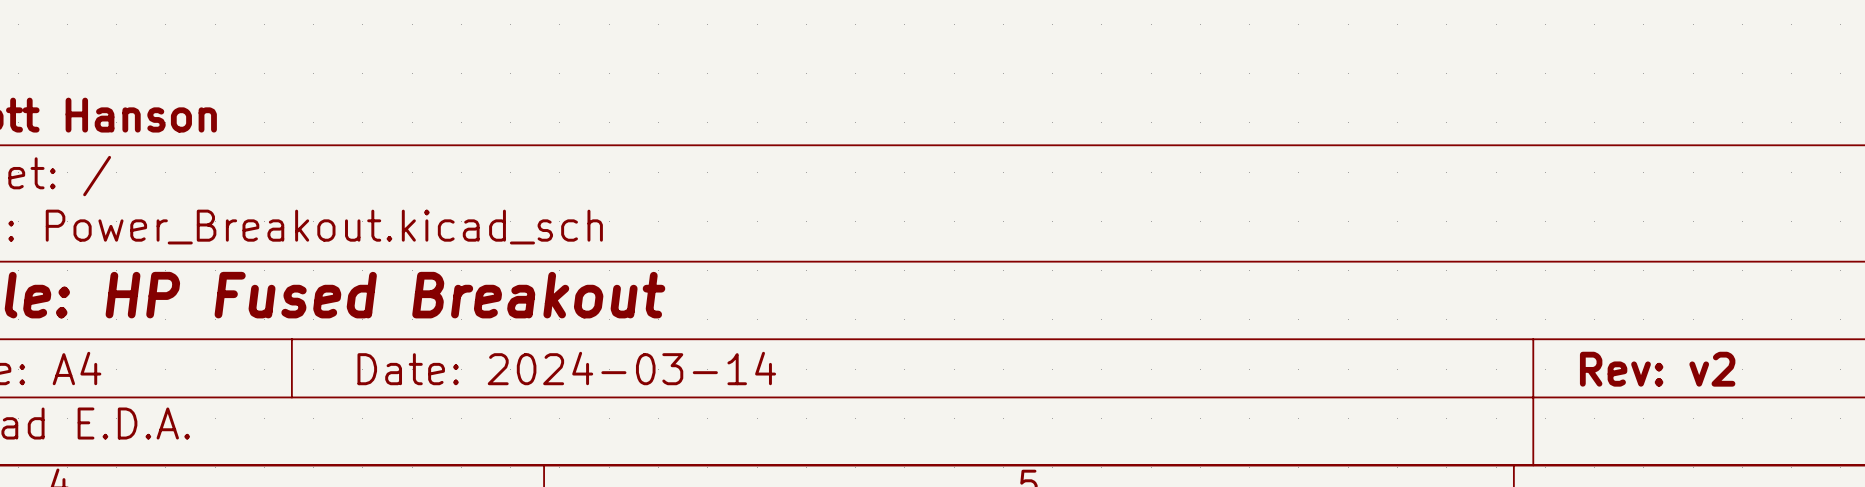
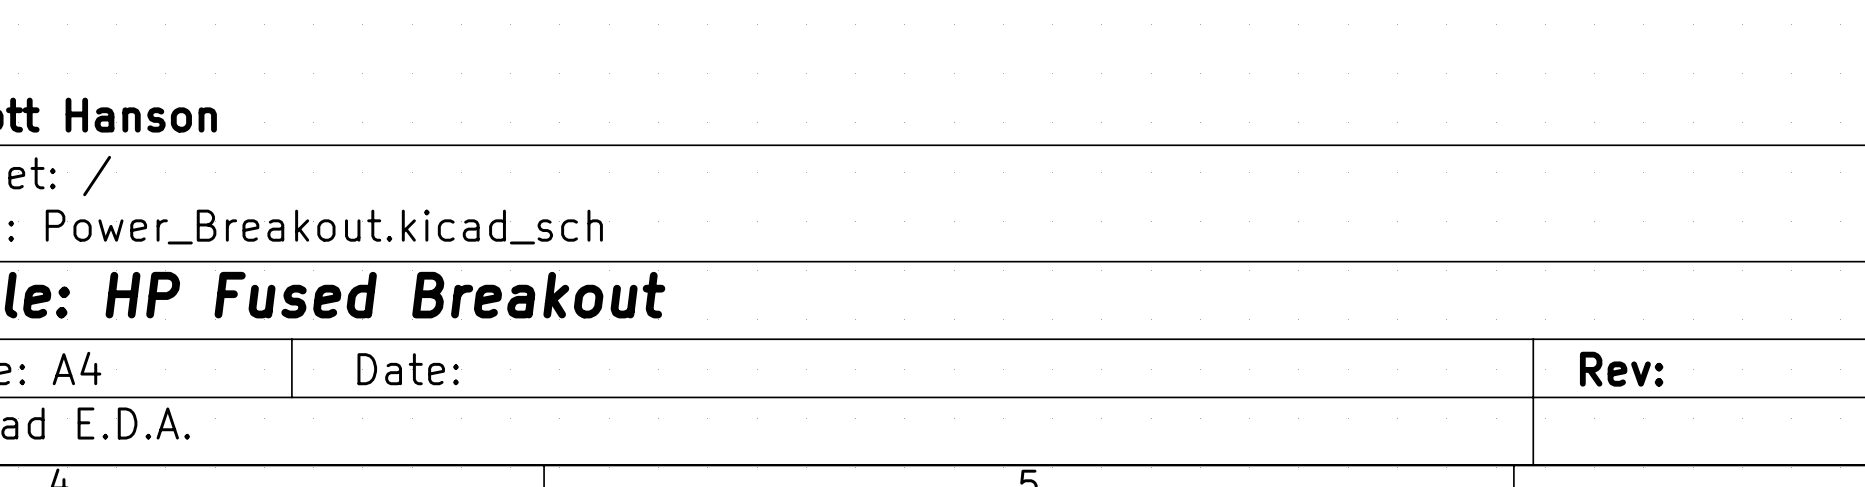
title block: Date: 2024-03-14 (566, 368) -> Date: (408, 369)
title block: Rev: v2 (1657, 369) -> Rev: (1621, 369)

